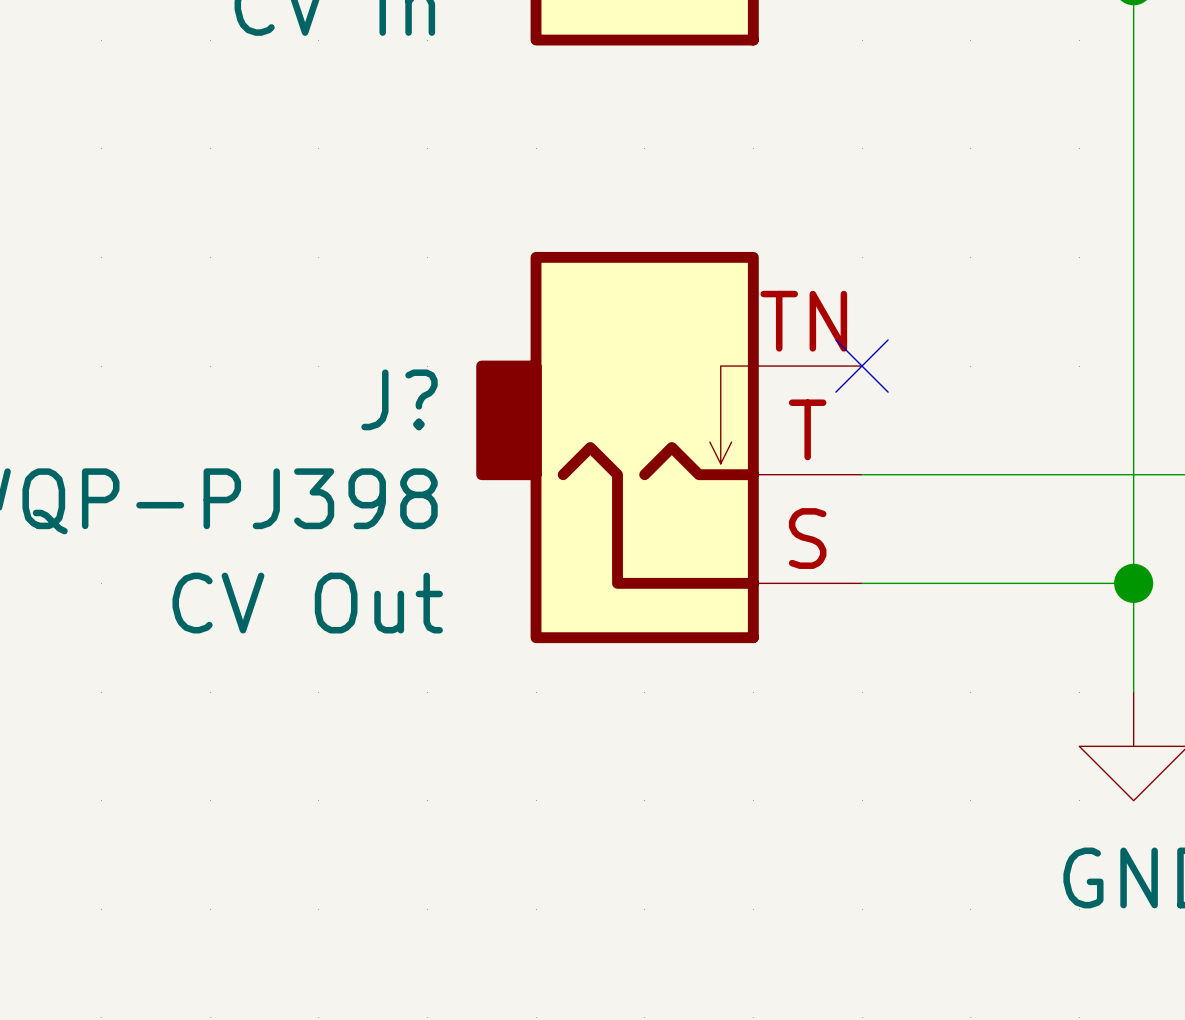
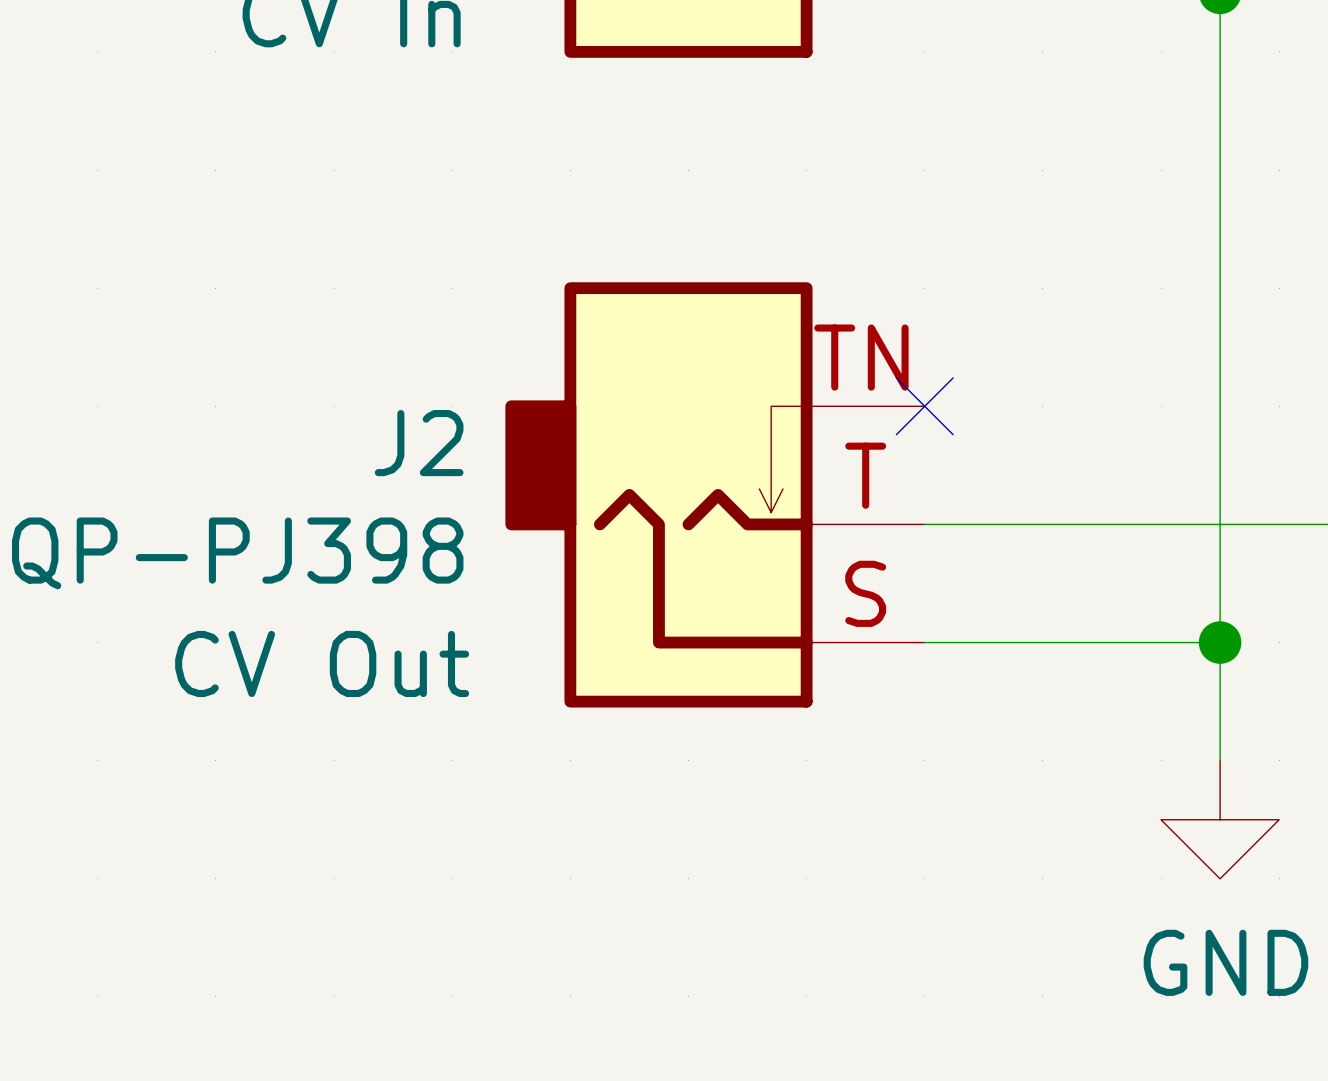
J? name: J? (399, 399) -> J2 (419, 443)

